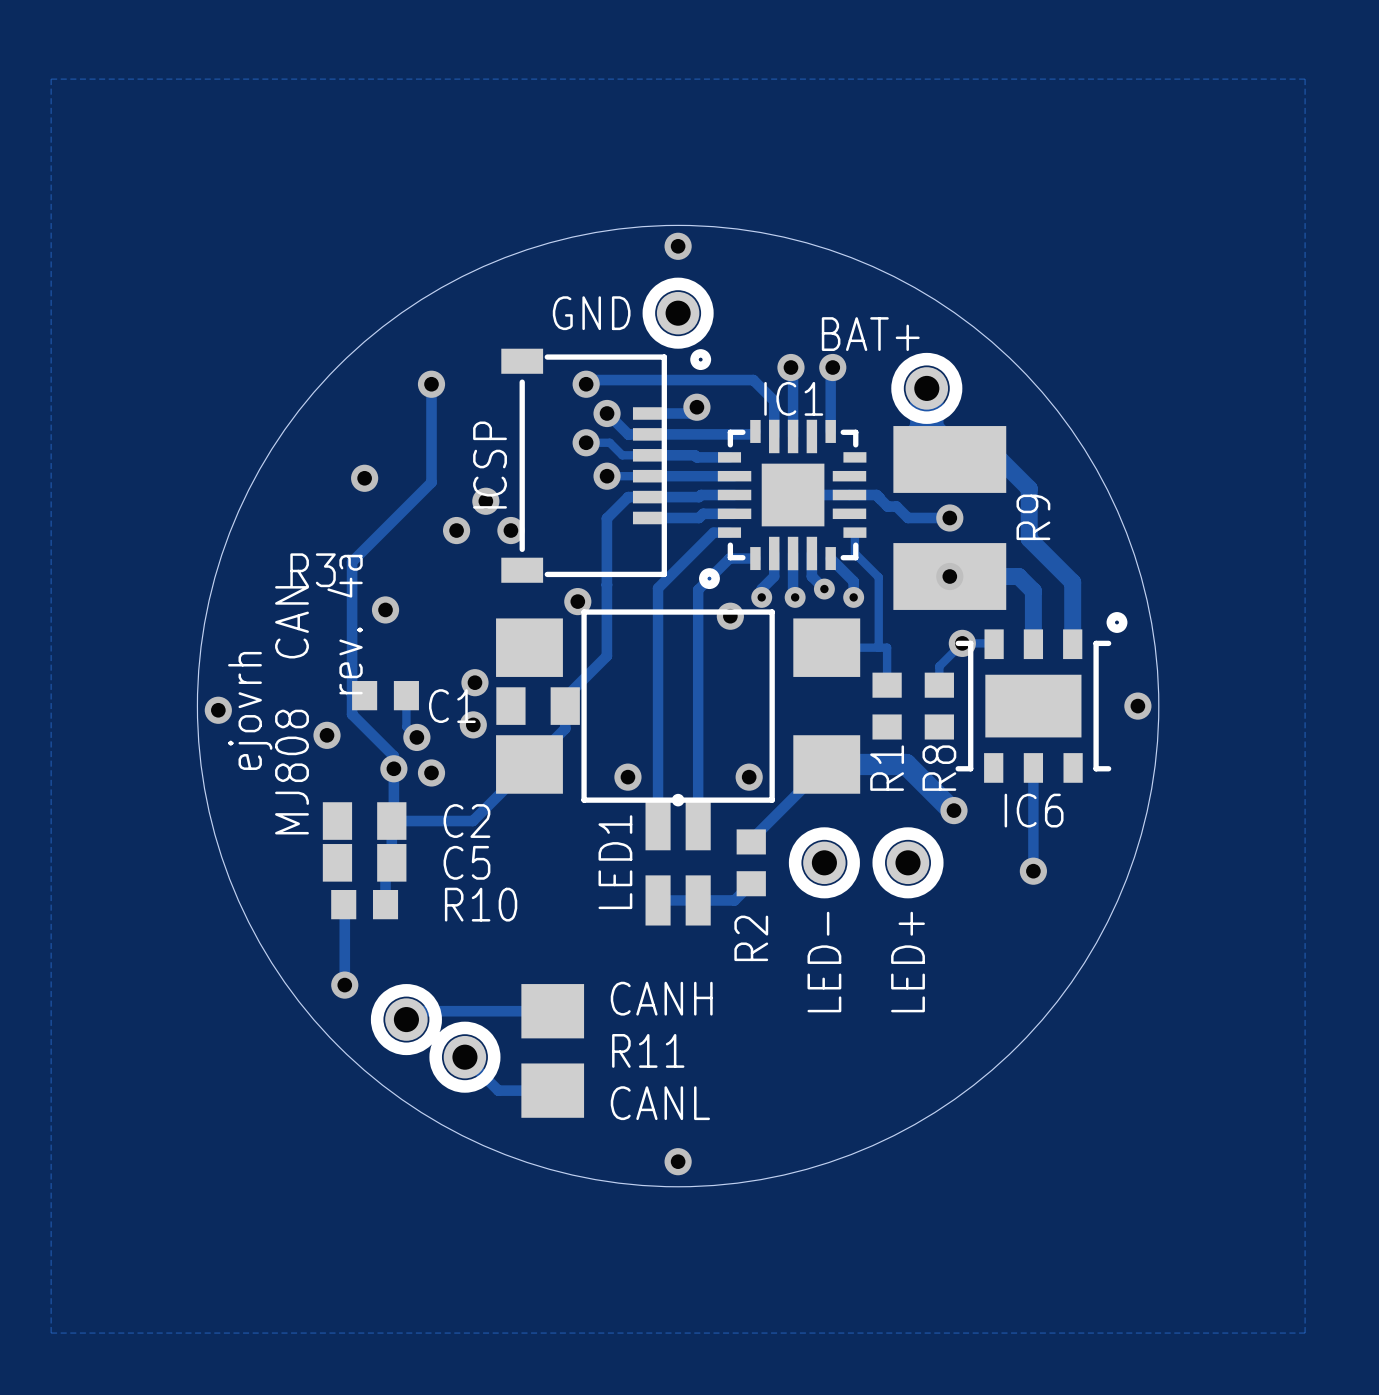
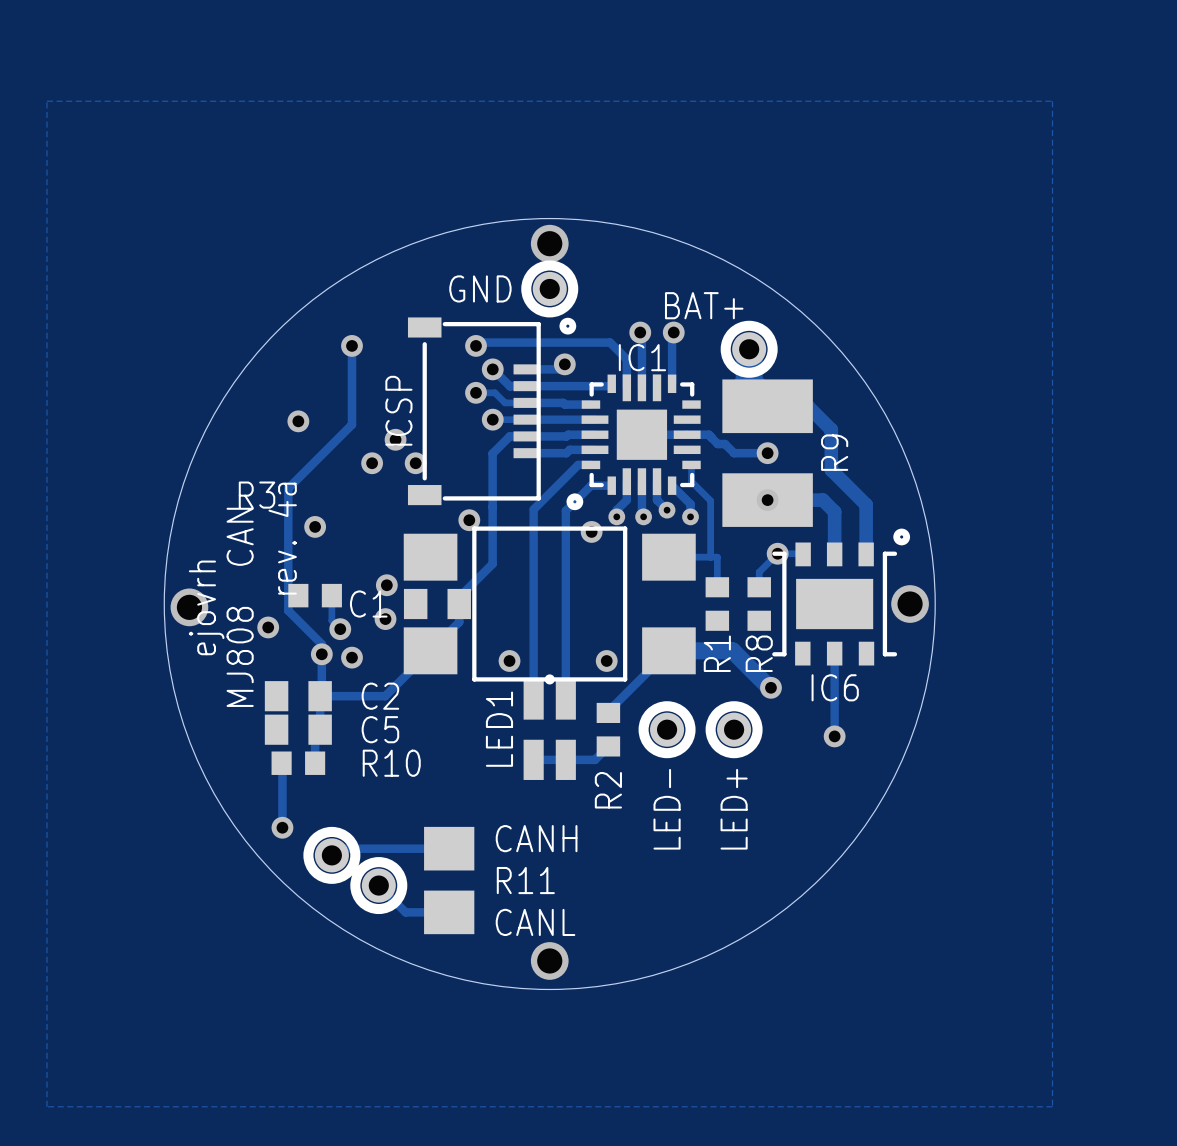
via size: [664, 232, 692, 260] -> [530, 224, 569, 263]
via size: [1124, 692, 1152, 720] -> [891, 585, 929, 623]
via size: [204, 696, 232, 724] -> [170, 588, 209, 627]
via size: [664, 1148, 692, 1176] -> [530, 942, 569, 980]

